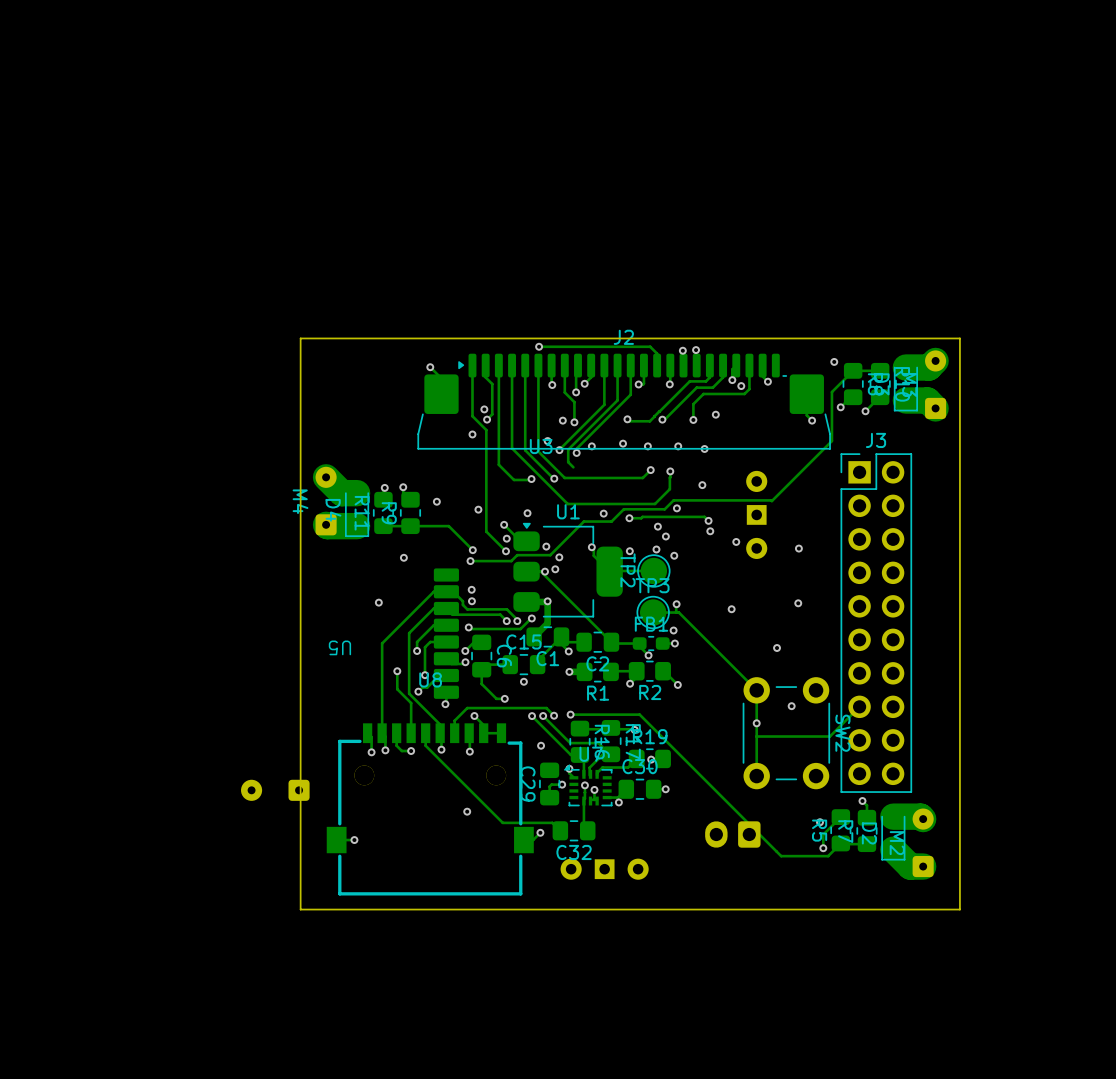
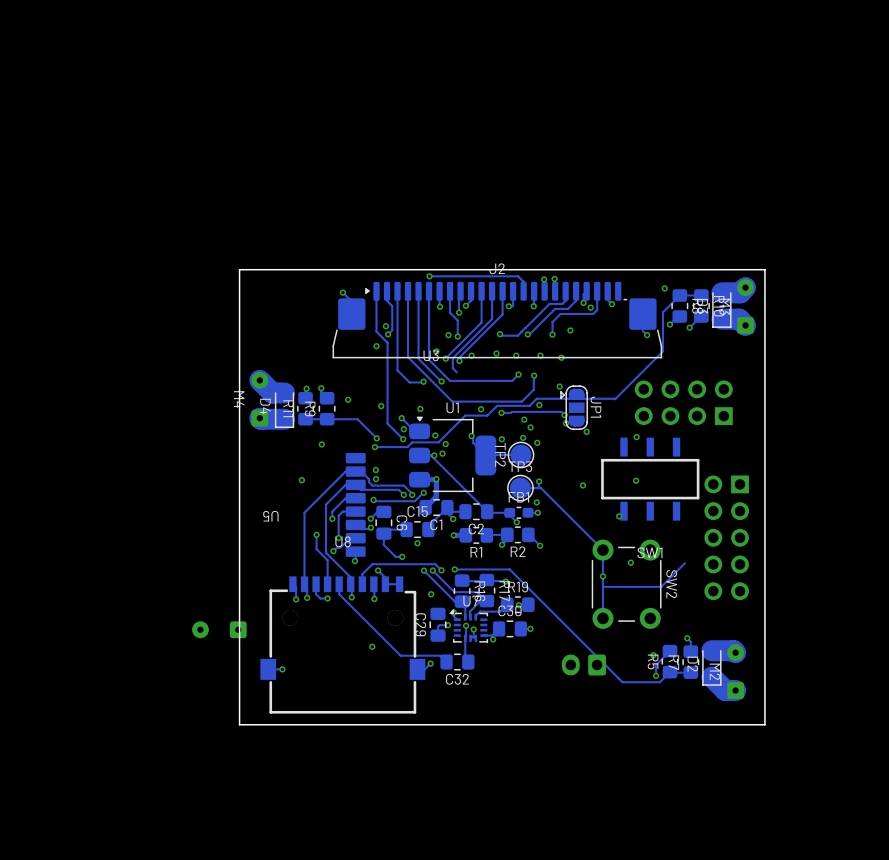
part: none -> (683, 402)
JP1: none -> (574, 407)
part: (756, 514) -> none
SW1: none -> (650, 479)
J3: (876, 623) -> none
part: none -> (726, 537)
part: (604, 869) -> none

